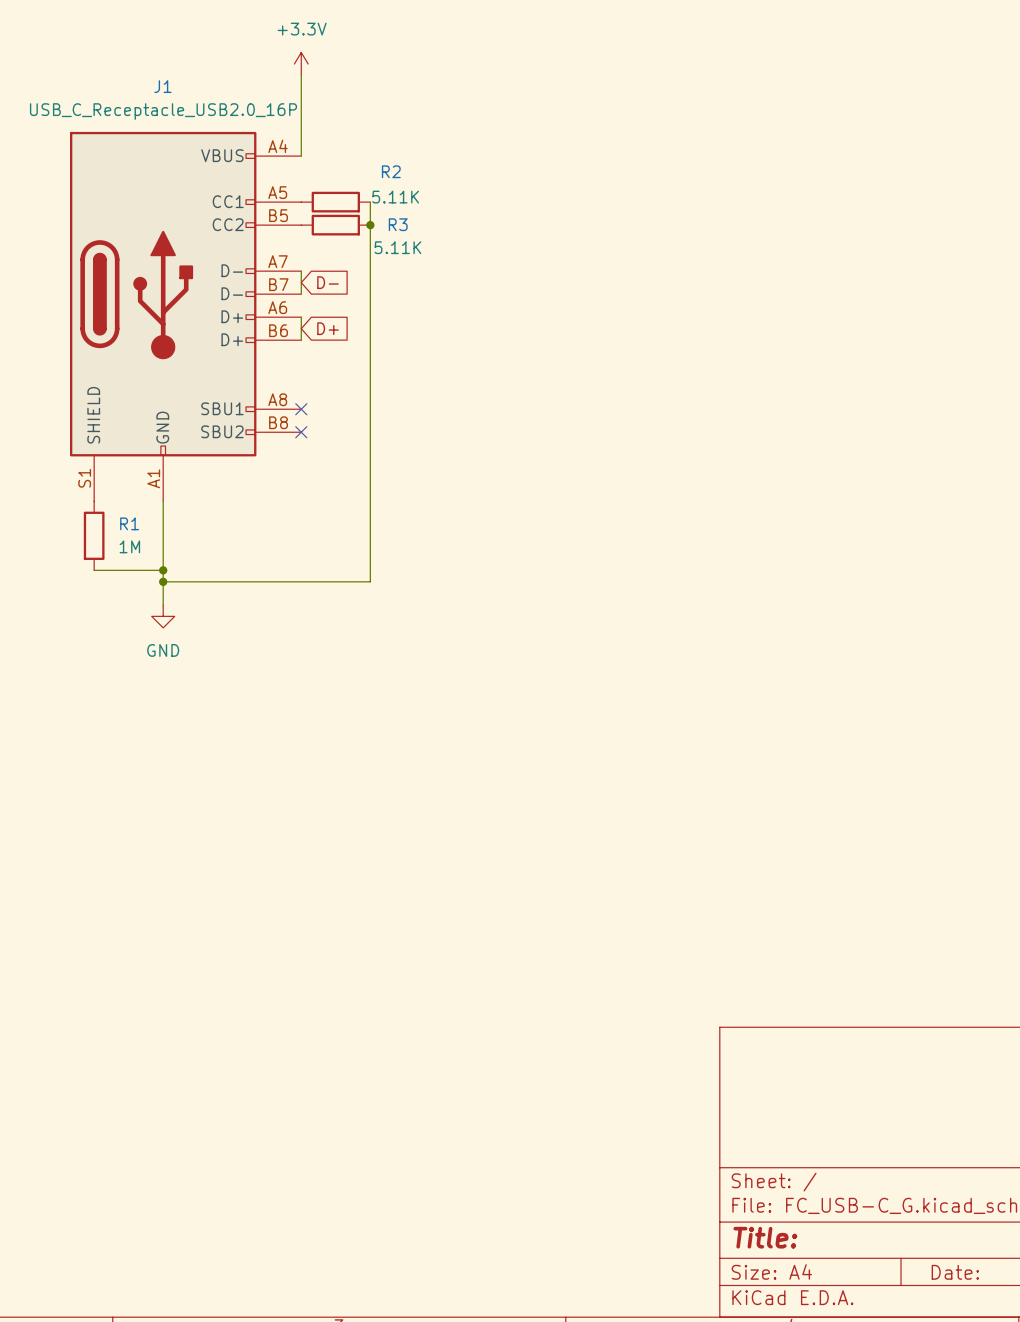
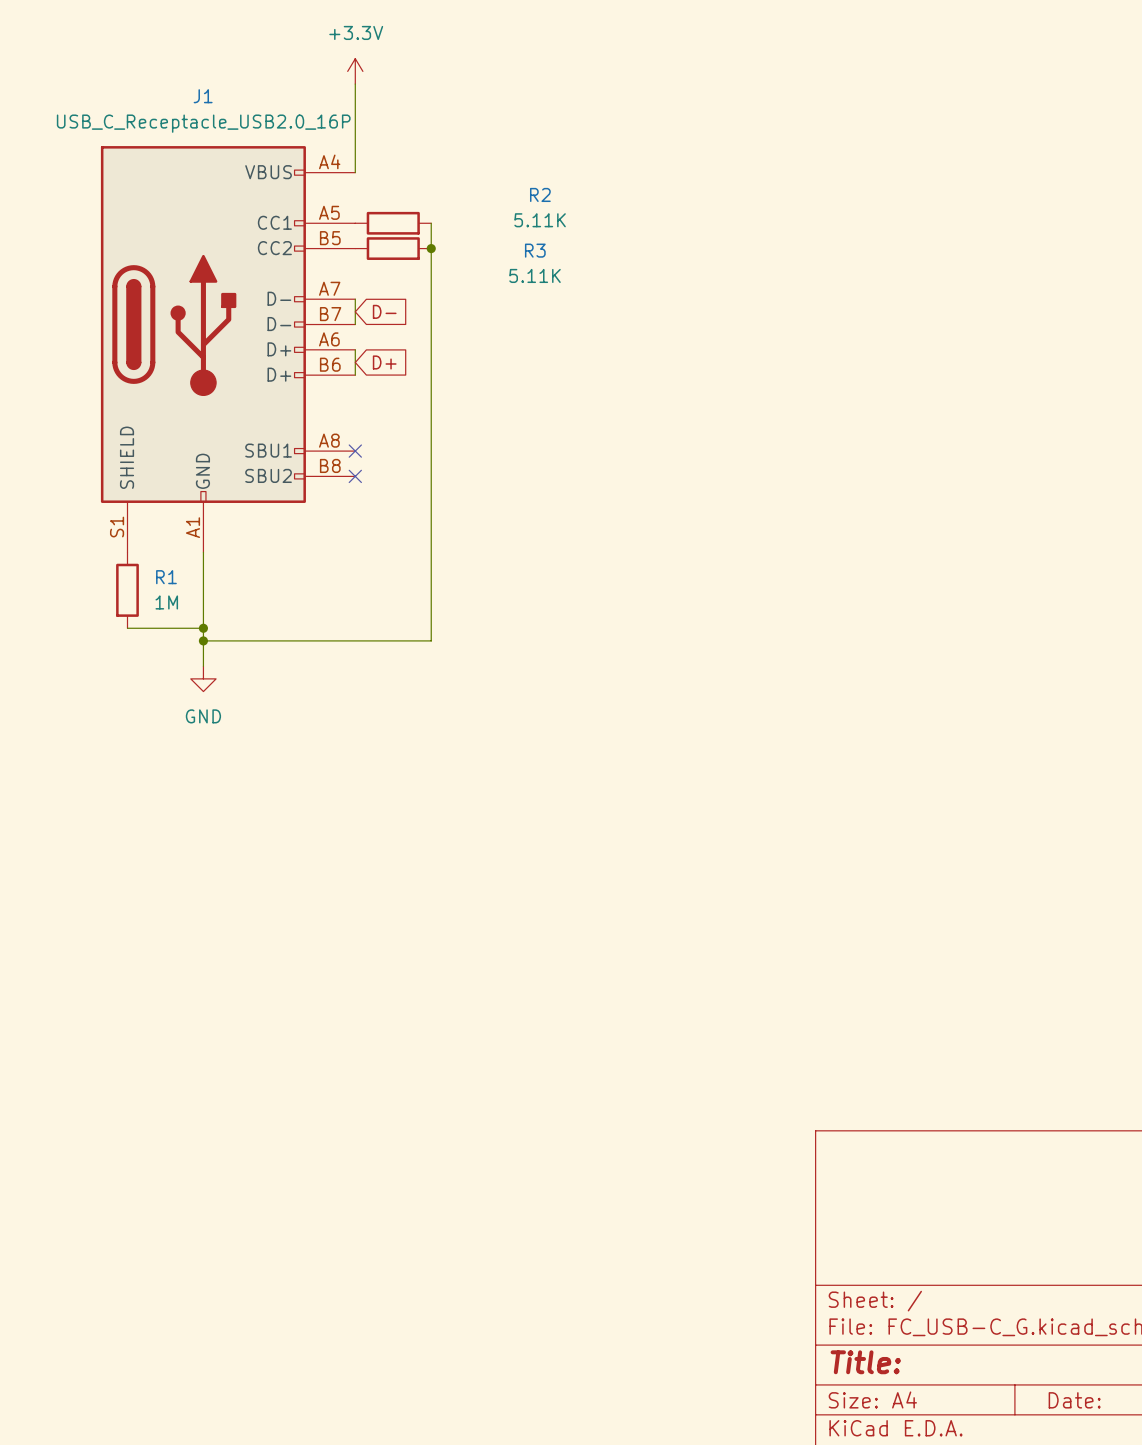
R2 name position: R2 (391, 171) -> R2 (540, 194)
R2 value position: 5.11K (395, 197) -> 5.11K (540, 220)
R3 name position: R3 (398, 224) -> R3 (535, 250)
R3 value position: 5.11K (397, 247) -> 5.11K (535, 275)

